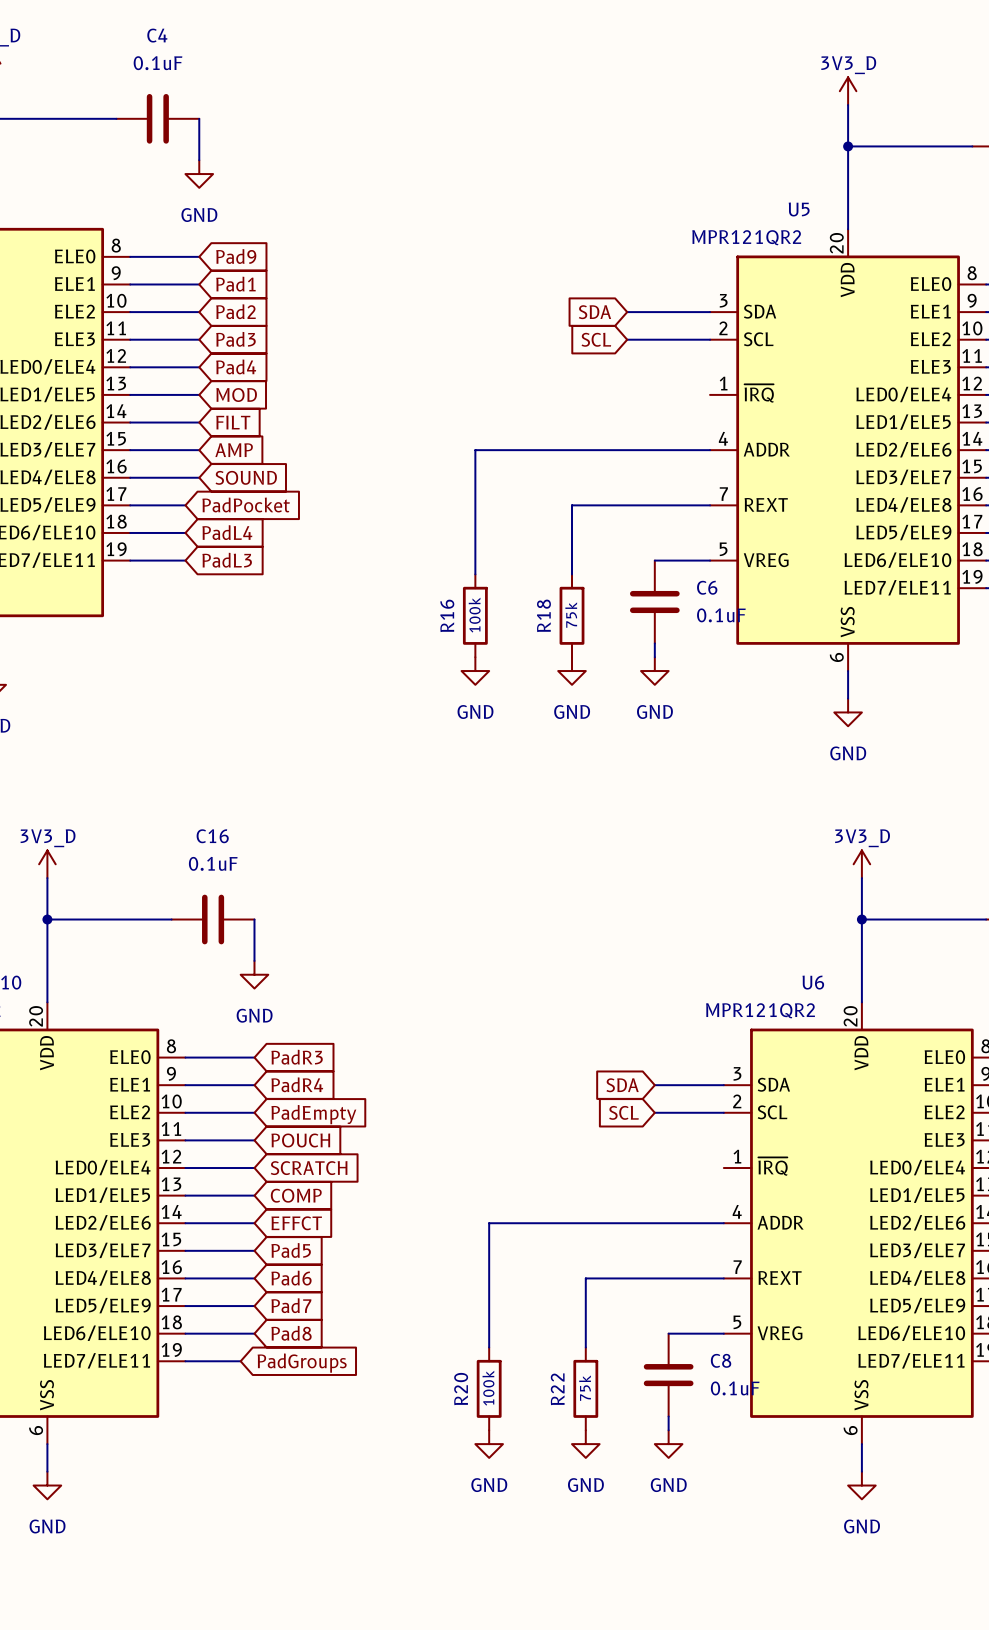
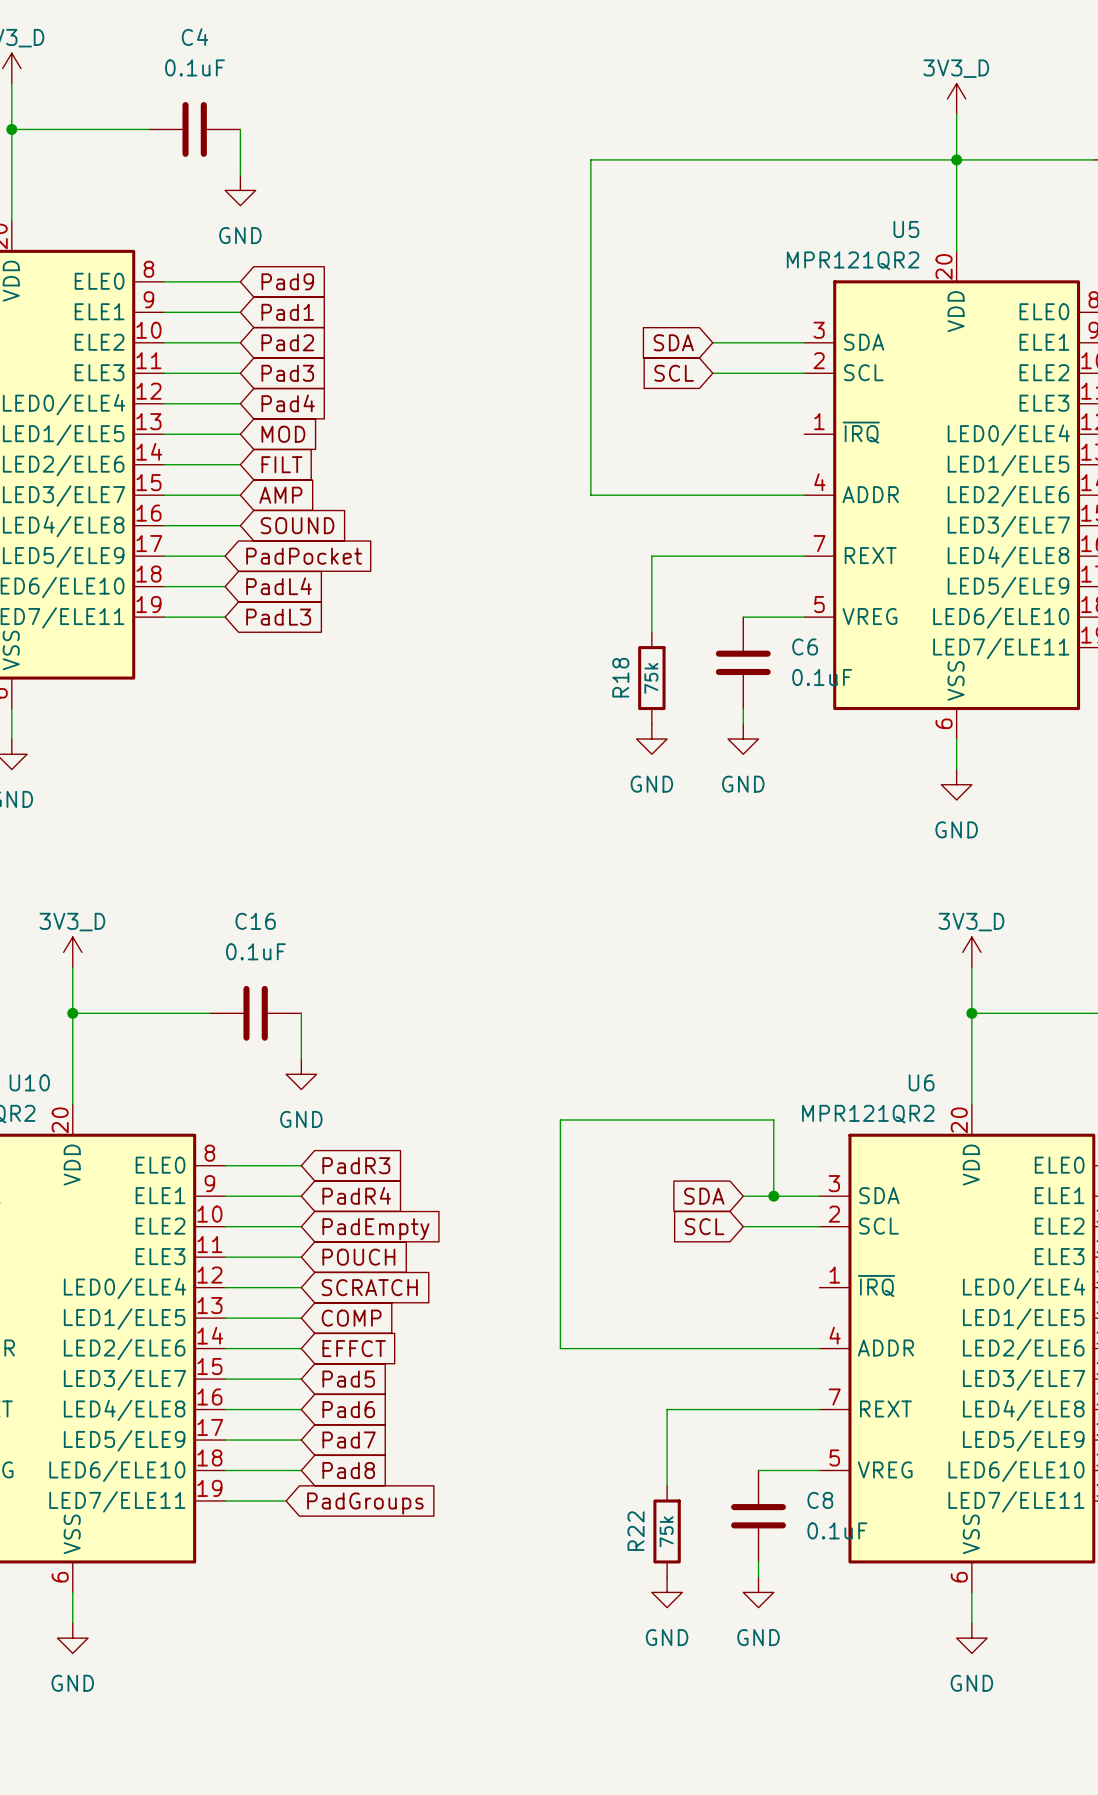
wire: (516, 450) (475, 450) (475, 574) -> (590, 495) (590, 159) (956, 159)
R16: 100k (475, 615) -> none
power symbol: GND (475, 671) -> none
junction: none -> (773, 1196)
wire: (489, 1223) (489, 1347) -> (560, 1348) (560, 1120) (773, 1120) (773, 1196)
R20: 100k (489, 1388) -> none
power symbol: GND (489, 1444) -> none

